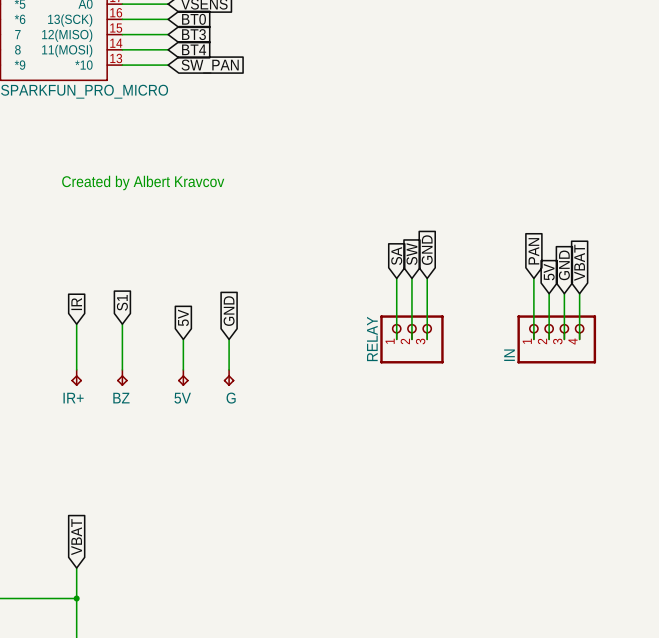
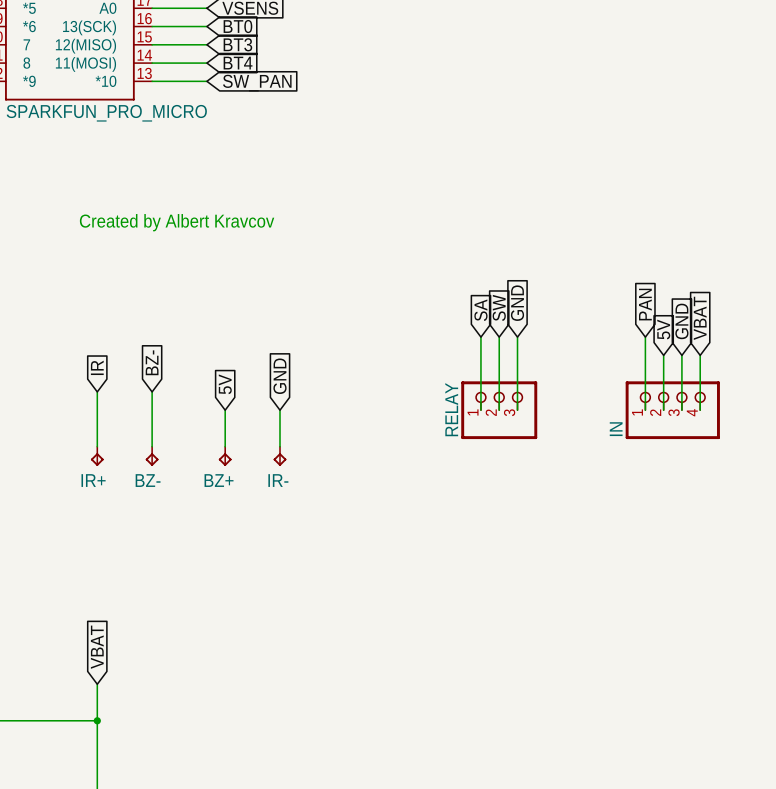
global label: S1 (122, 302) -> BZ- (152, 362)
BZ name: BZ (121, 398) -> BZ- (148, 480)
5V name: 5V (182, 398) -> BZ+ (219, 480)
G name: G (231, 398) -> IR- (278, 480)

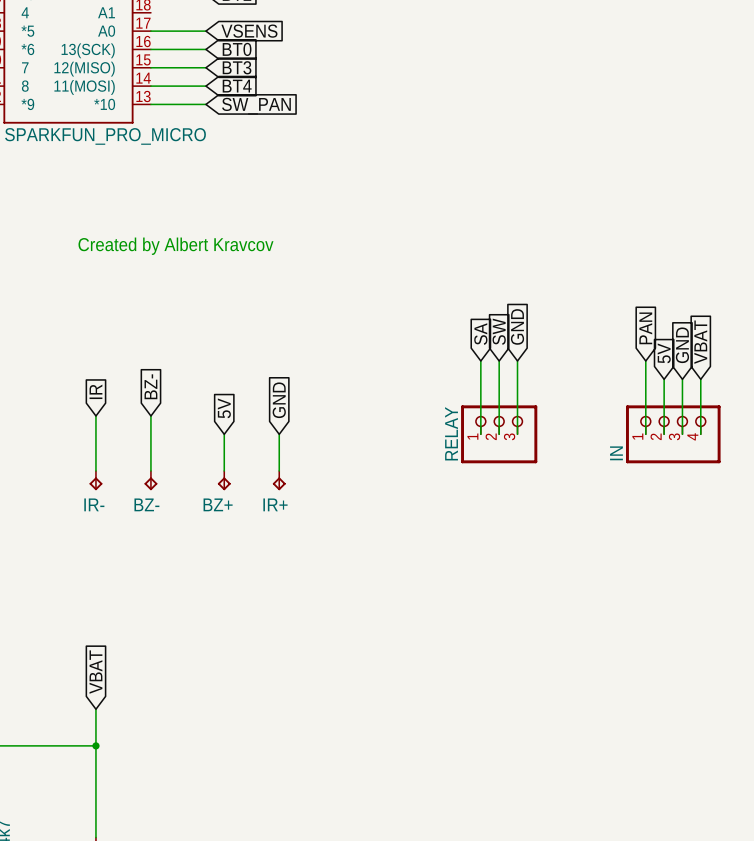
IR+ name: IR+ (93, 480) -> IR- (94, 504)
IR- name: IR- (278, 480) -> IR+ (275, 504)

